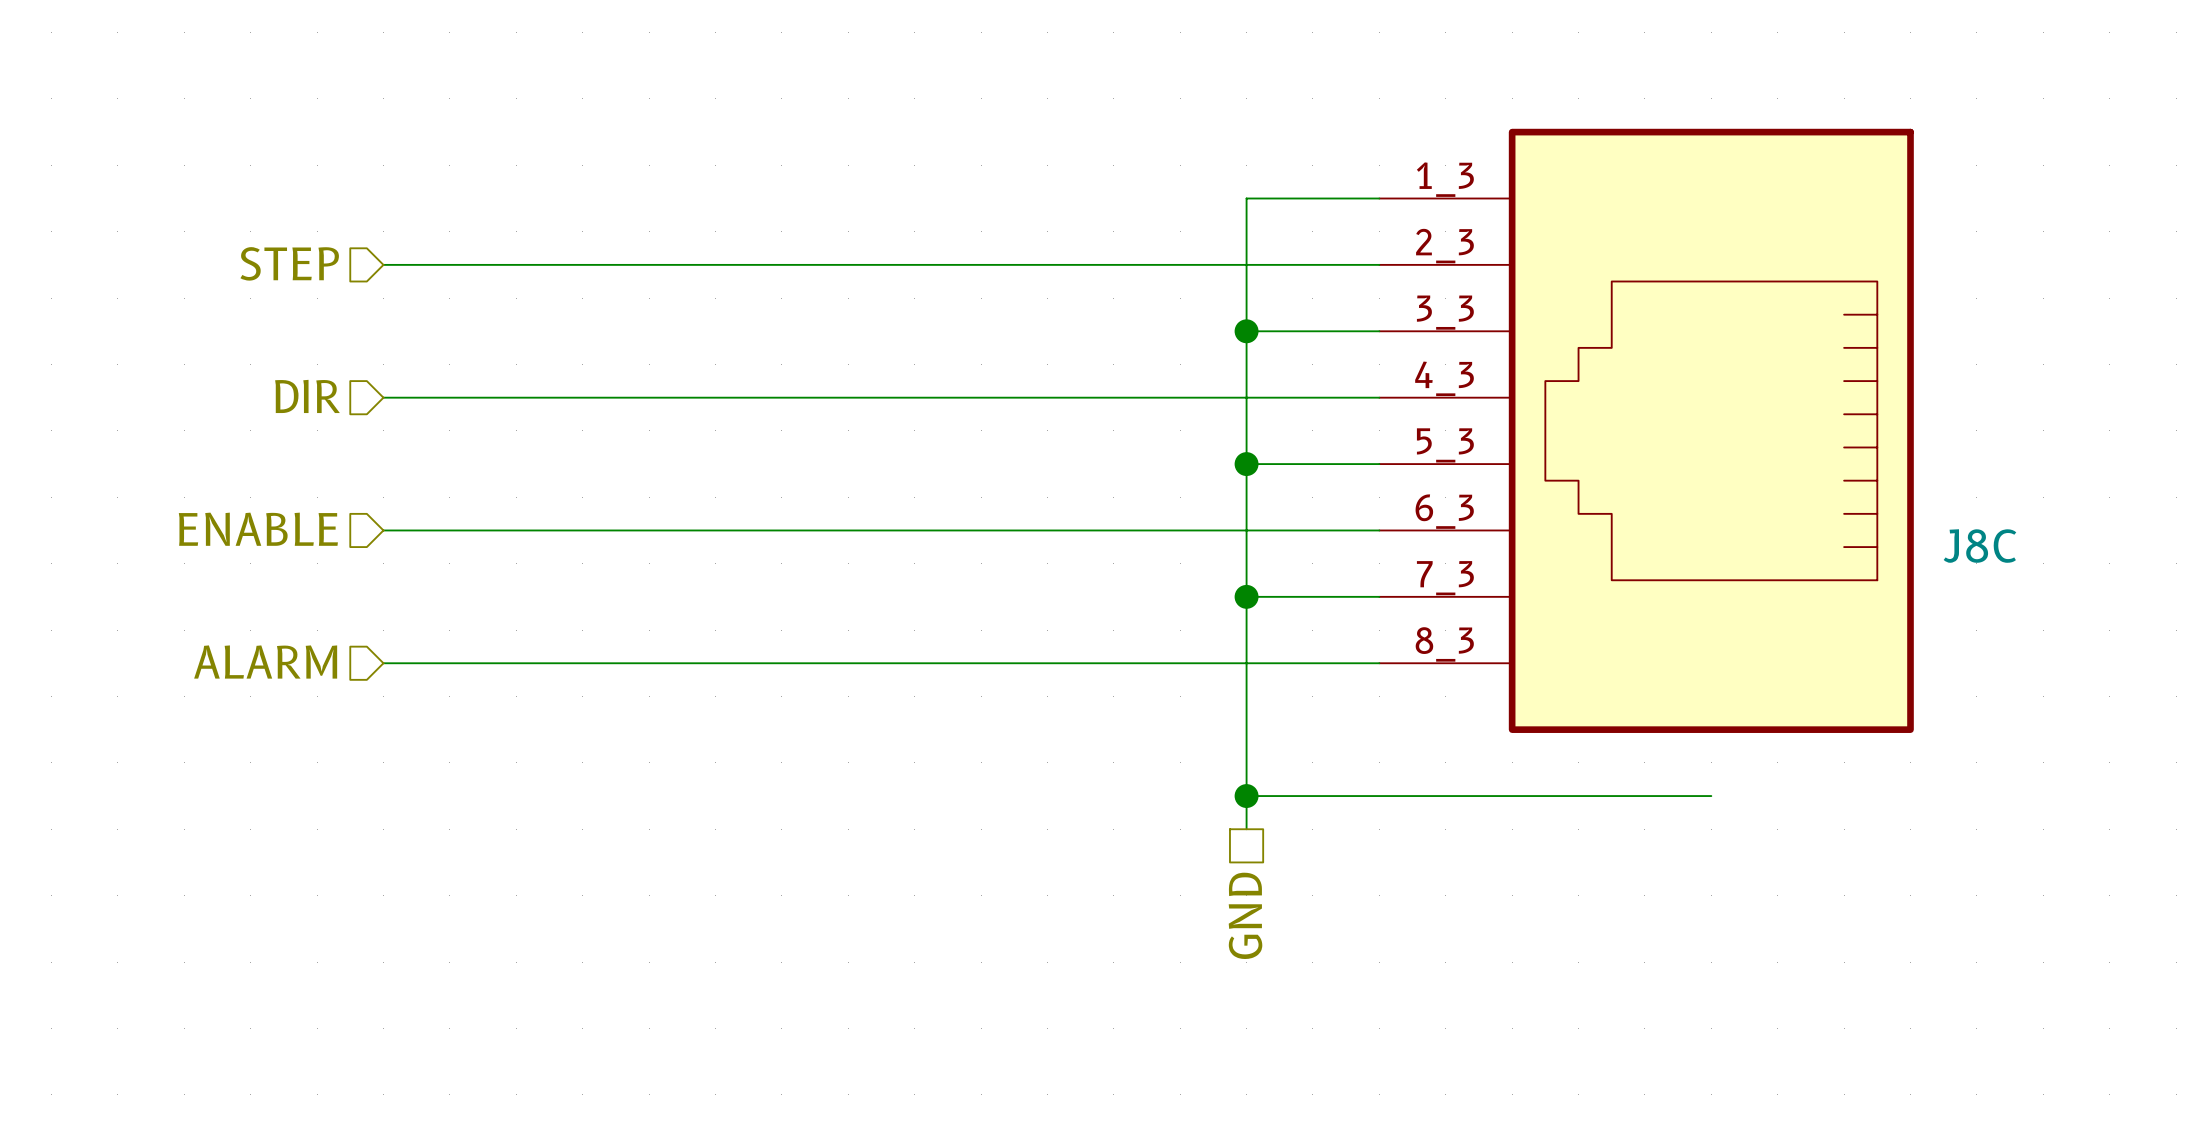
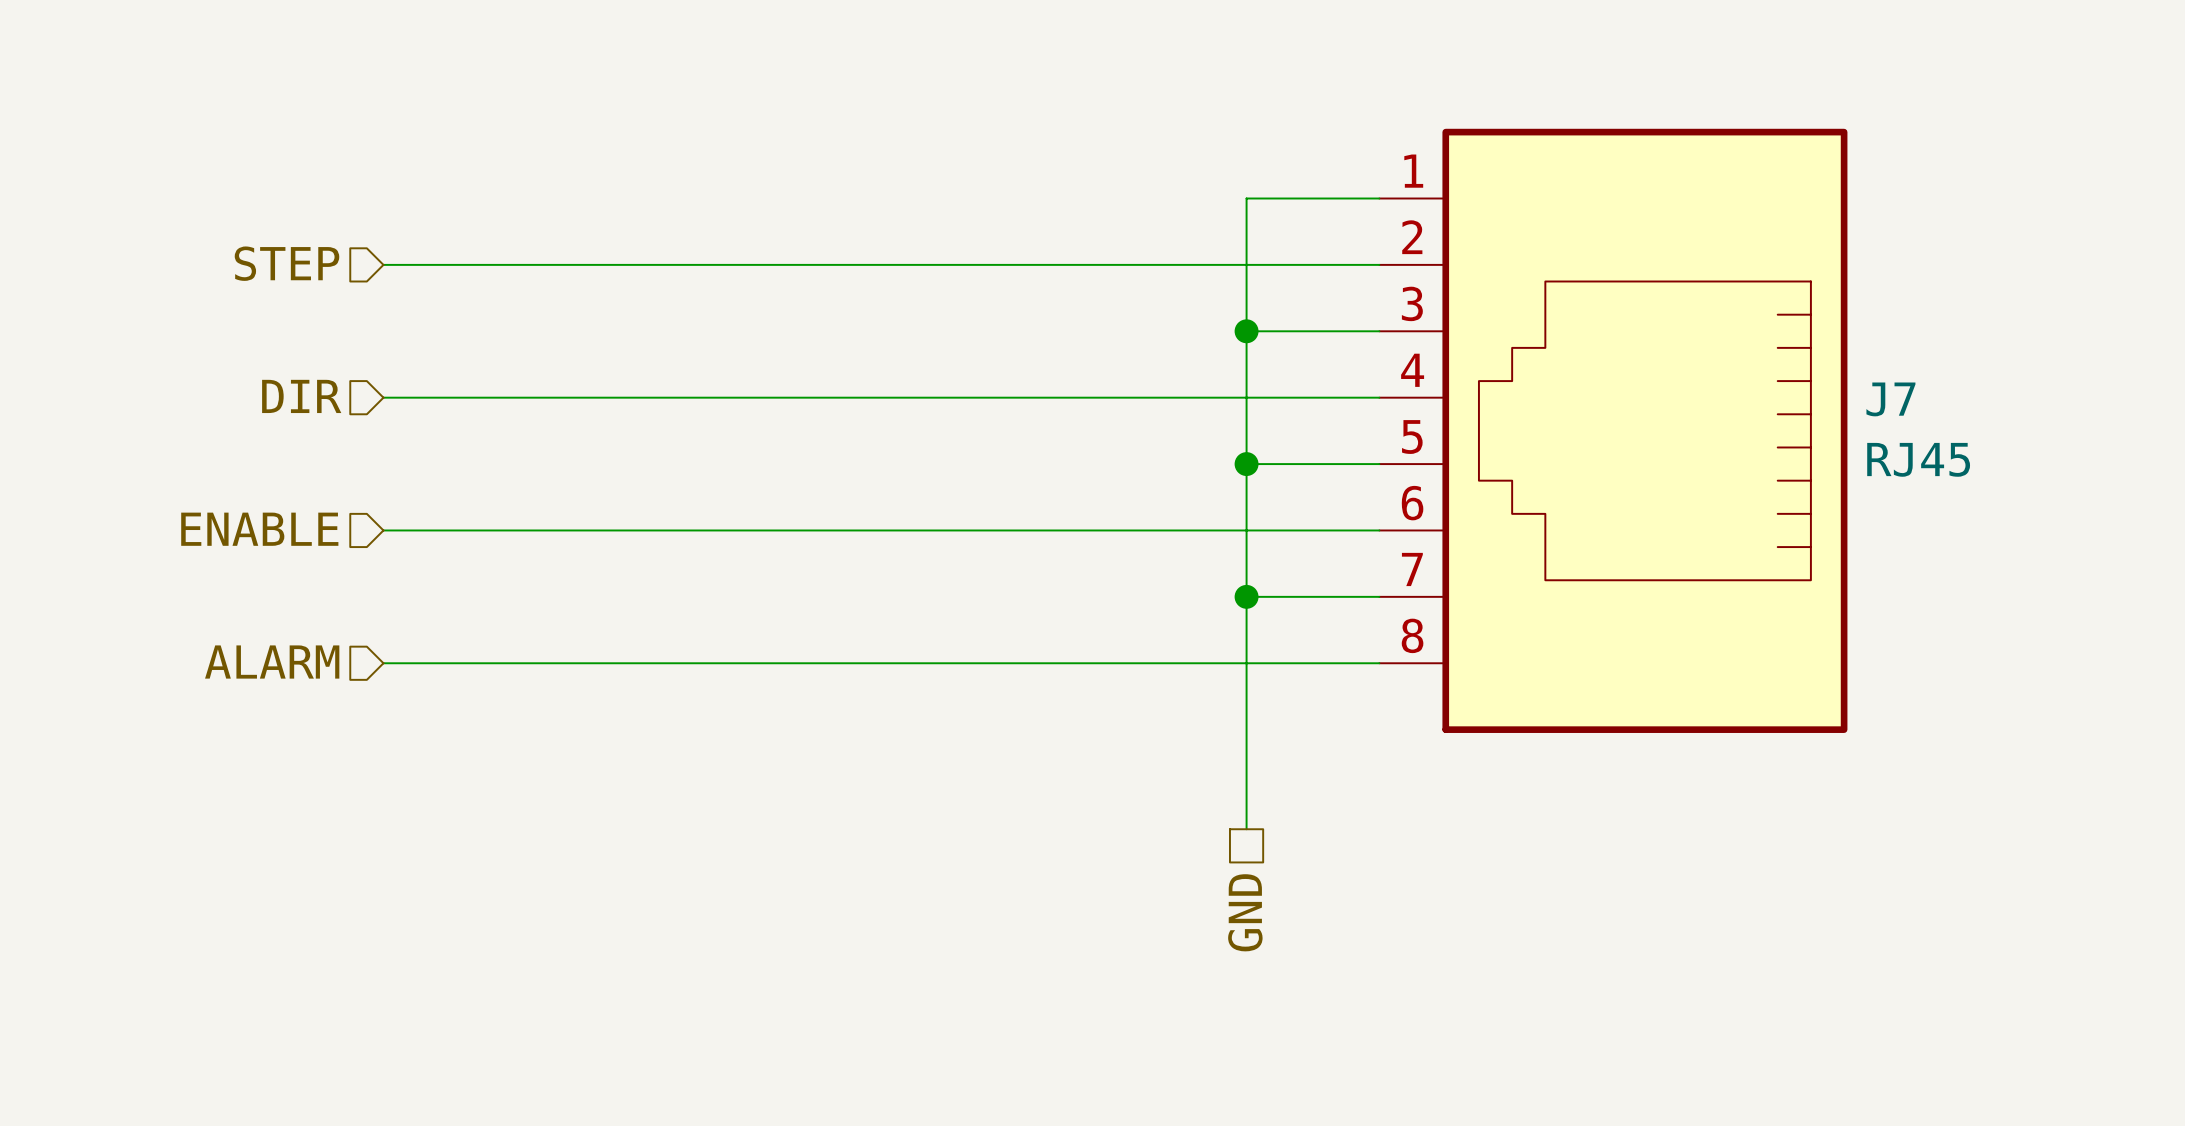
J7: none -> RJ45 (1613, 430)
J8C: (1646, 430) -> none
wire: (1246, 796) (1711, 796) -> none
junction: (1246, 796) -> none

